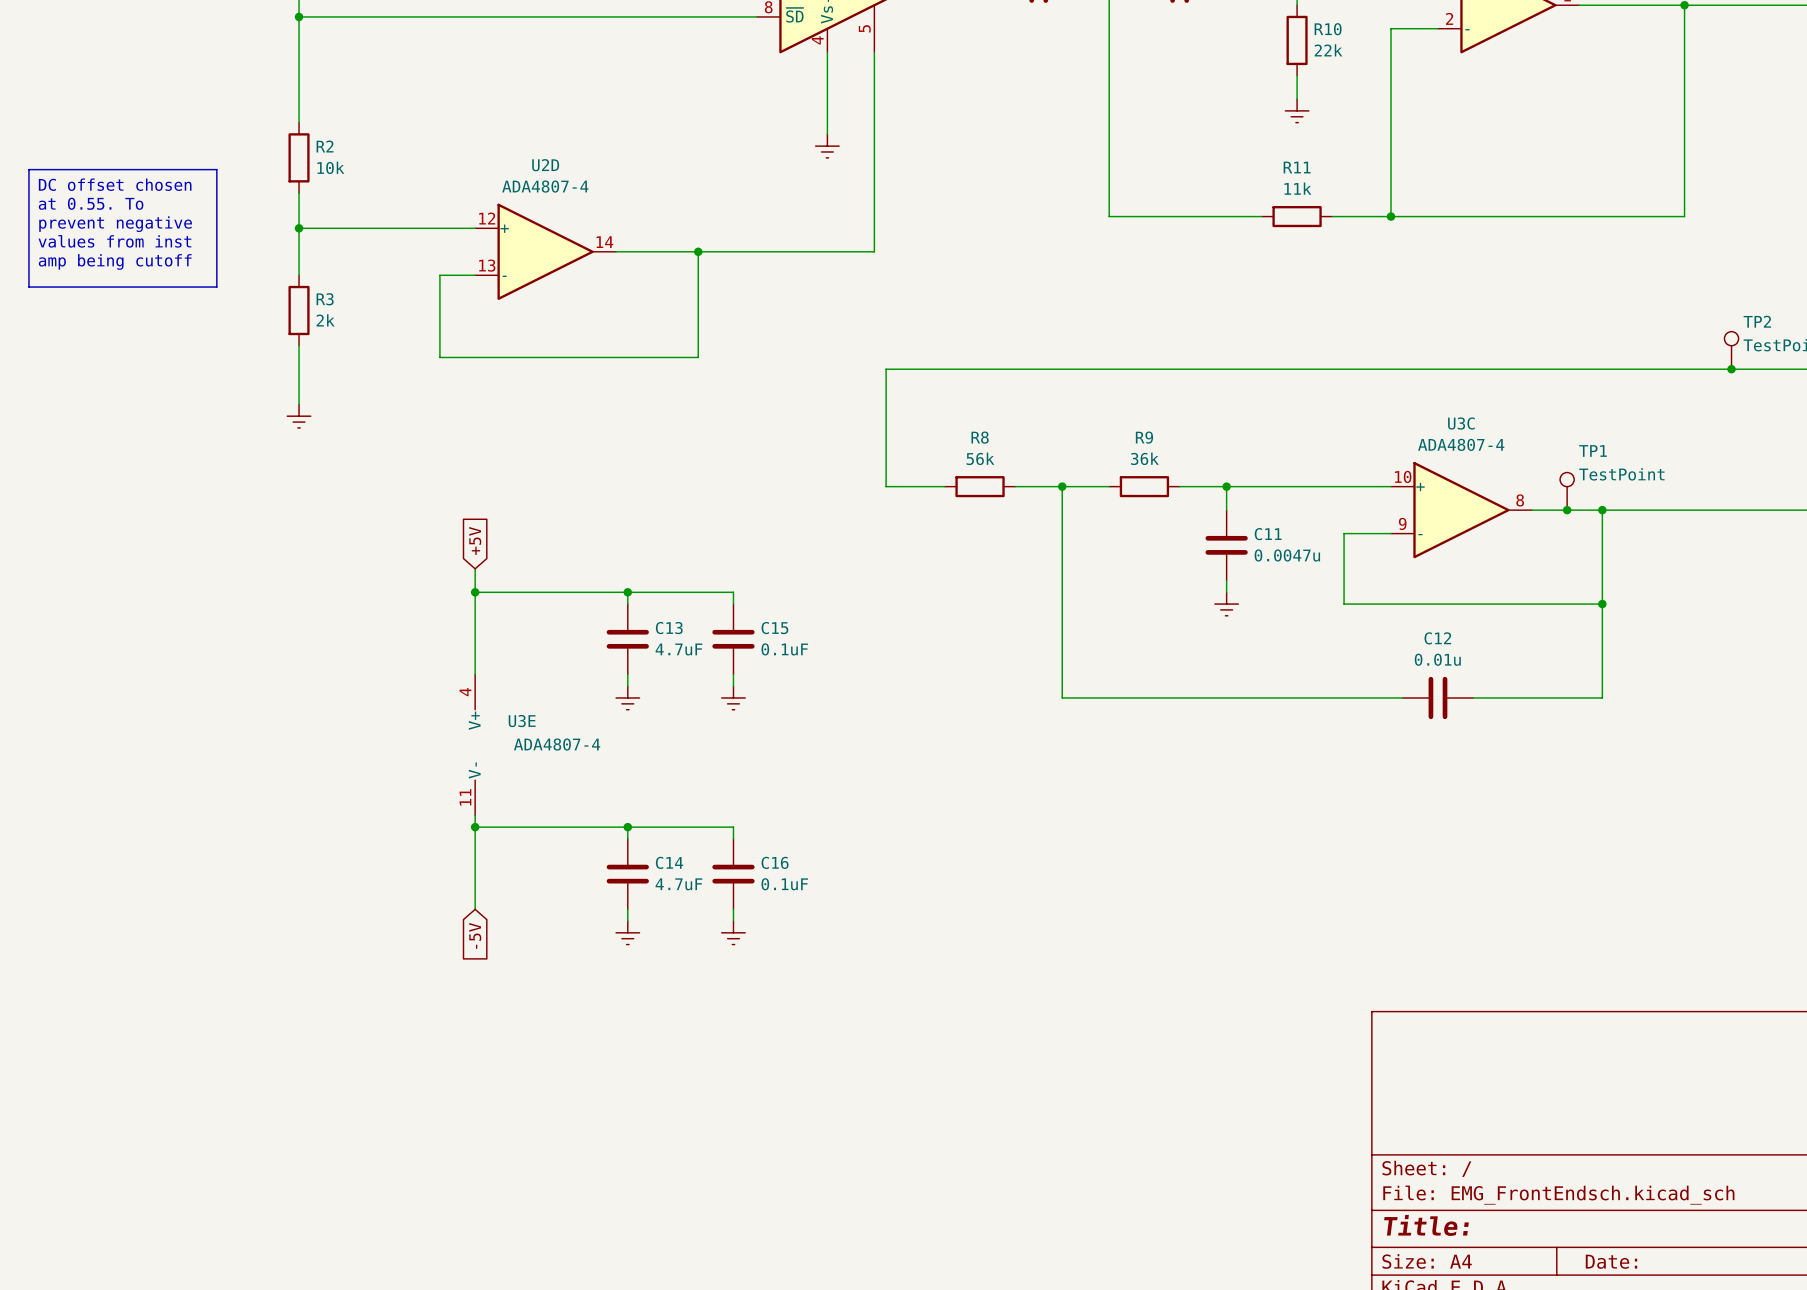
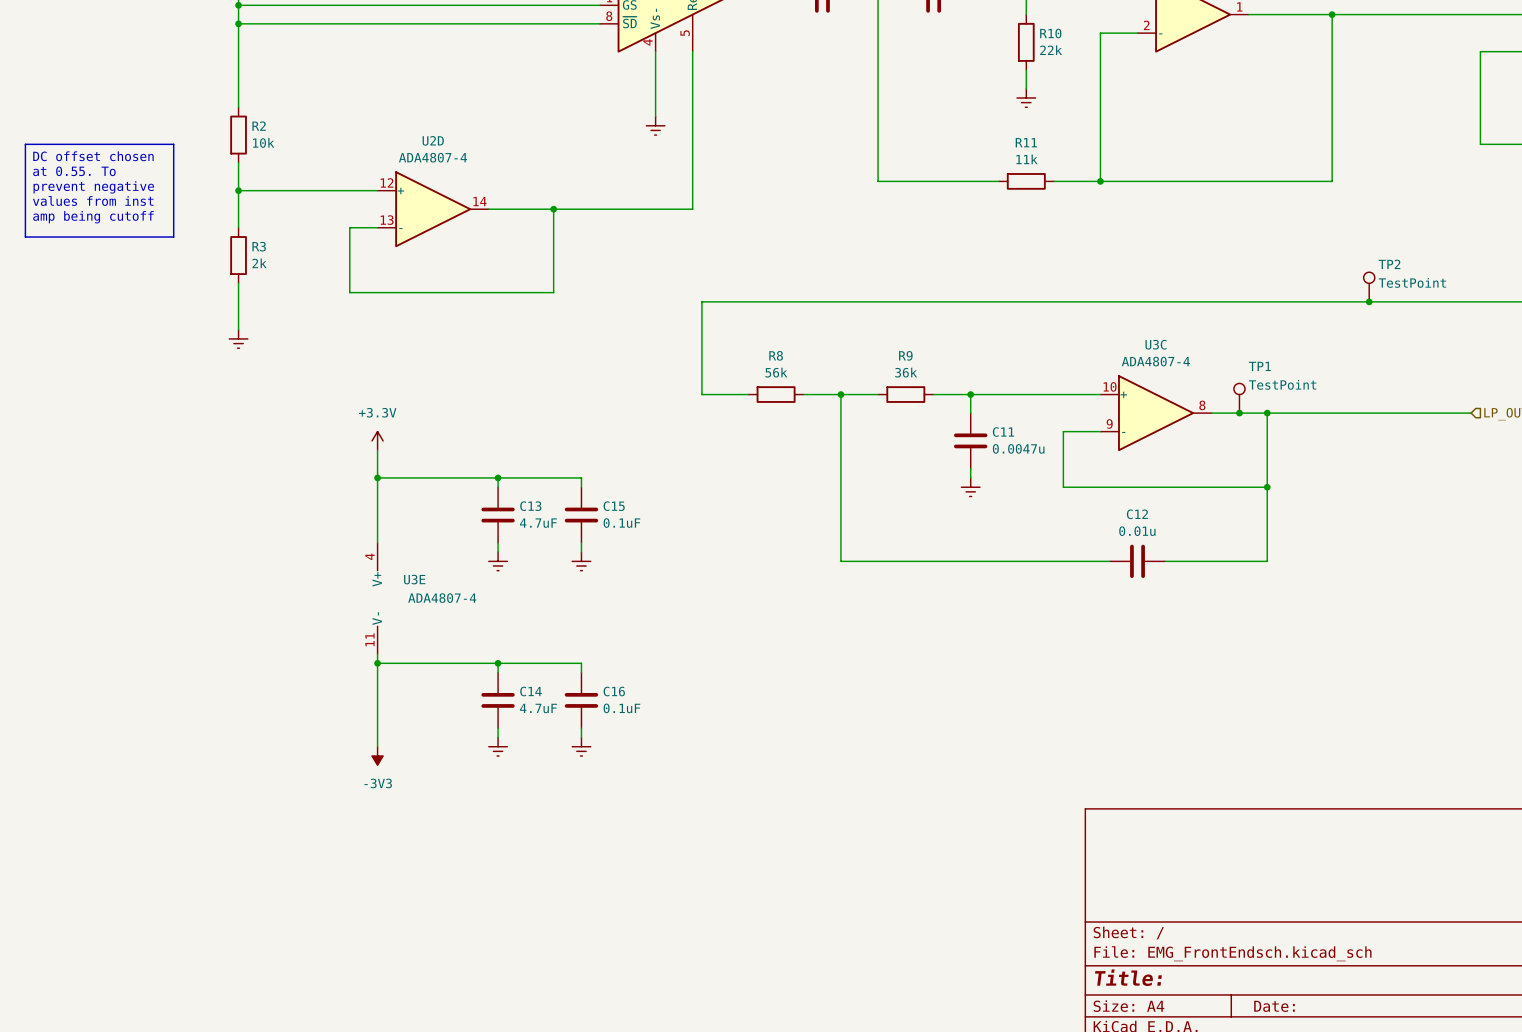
global label: +5V (475, 540) -> none
power symbol: none -> +3.3V (377, 440)
wire: none -> (377, 450) (377, 459)
wire: none -> (377, 728) (377, 746)
global label: -5V (475, 935) -> none
power symbol: none -> -3V3 (377, 755)

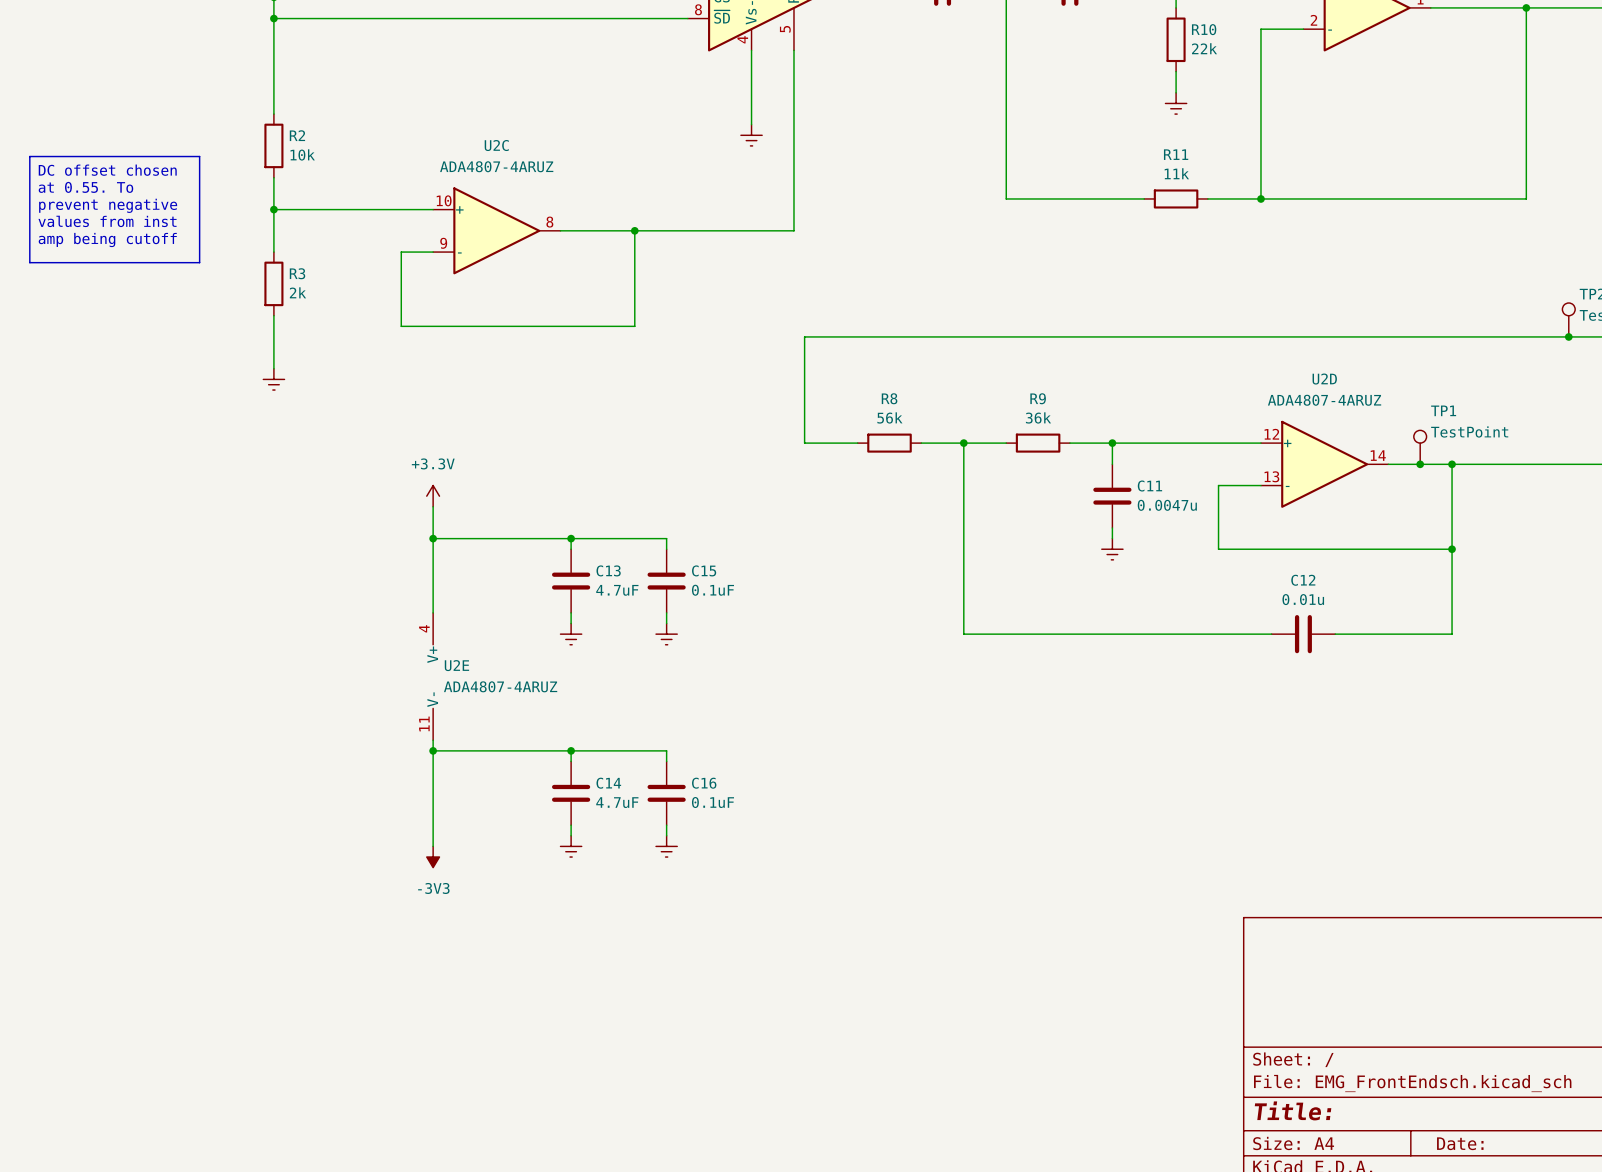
U2D name position: U2D (433, 140) -> U2D (1324, 379)
U2D value: ADA4807-4 (432, 157) -> ADA4807-4ARUZ (1324, 400)
U2D position: (433, 209) -> (1324, 464)
U2C: none -> ADA4807-4ARUZ (496, 230)
U3C: ADA4807-4 (1156, 413) -> none
U3E name: U3E (414, 579) -> U2E (456, 665)
U3E value: ADA4807-4 (442, 598) -> ADA4807-4ARUZ (500, 686)

